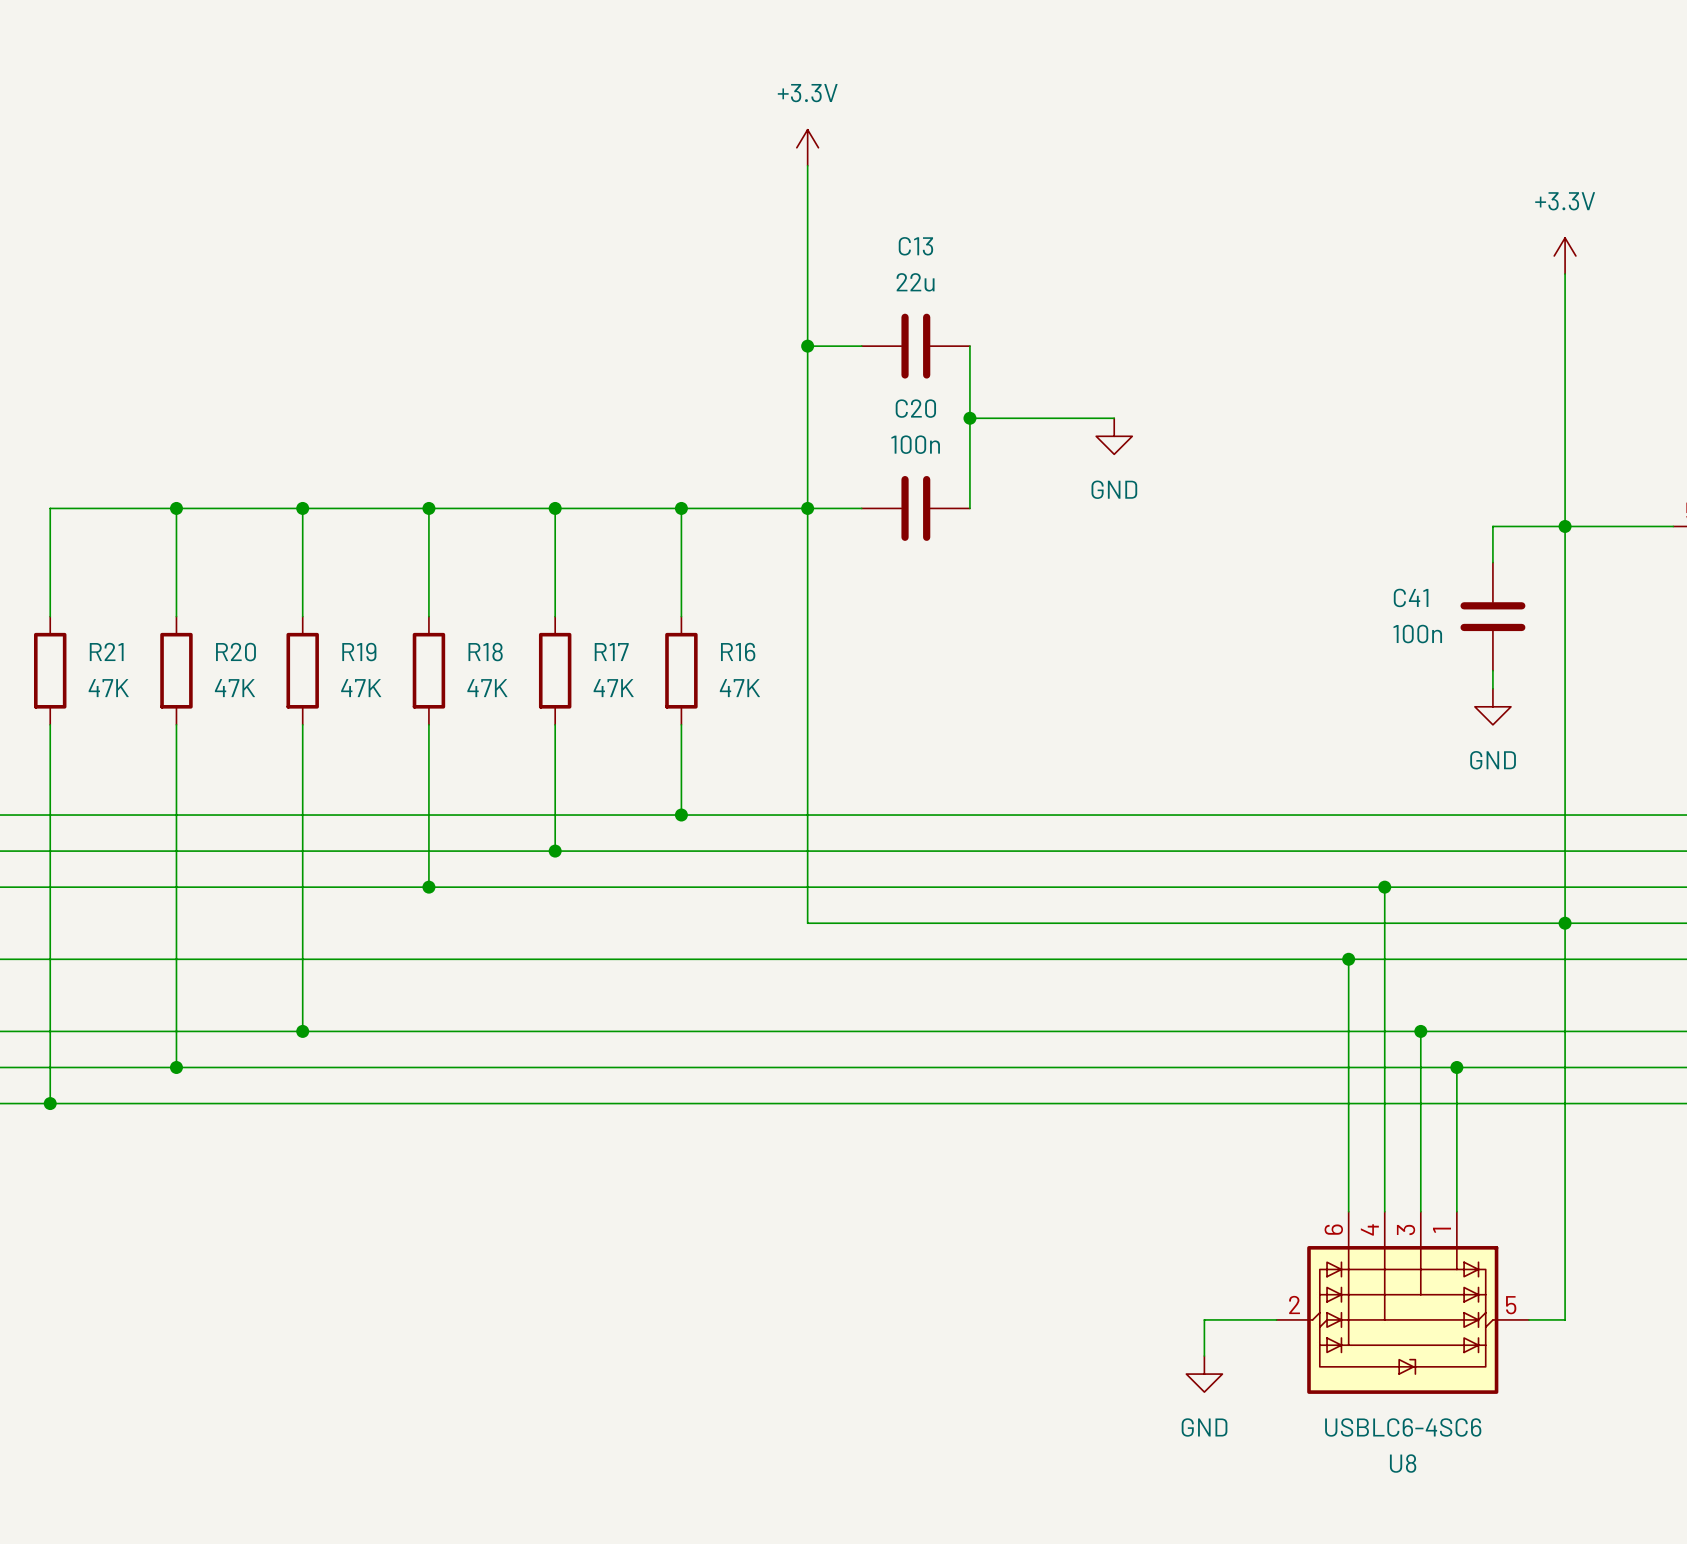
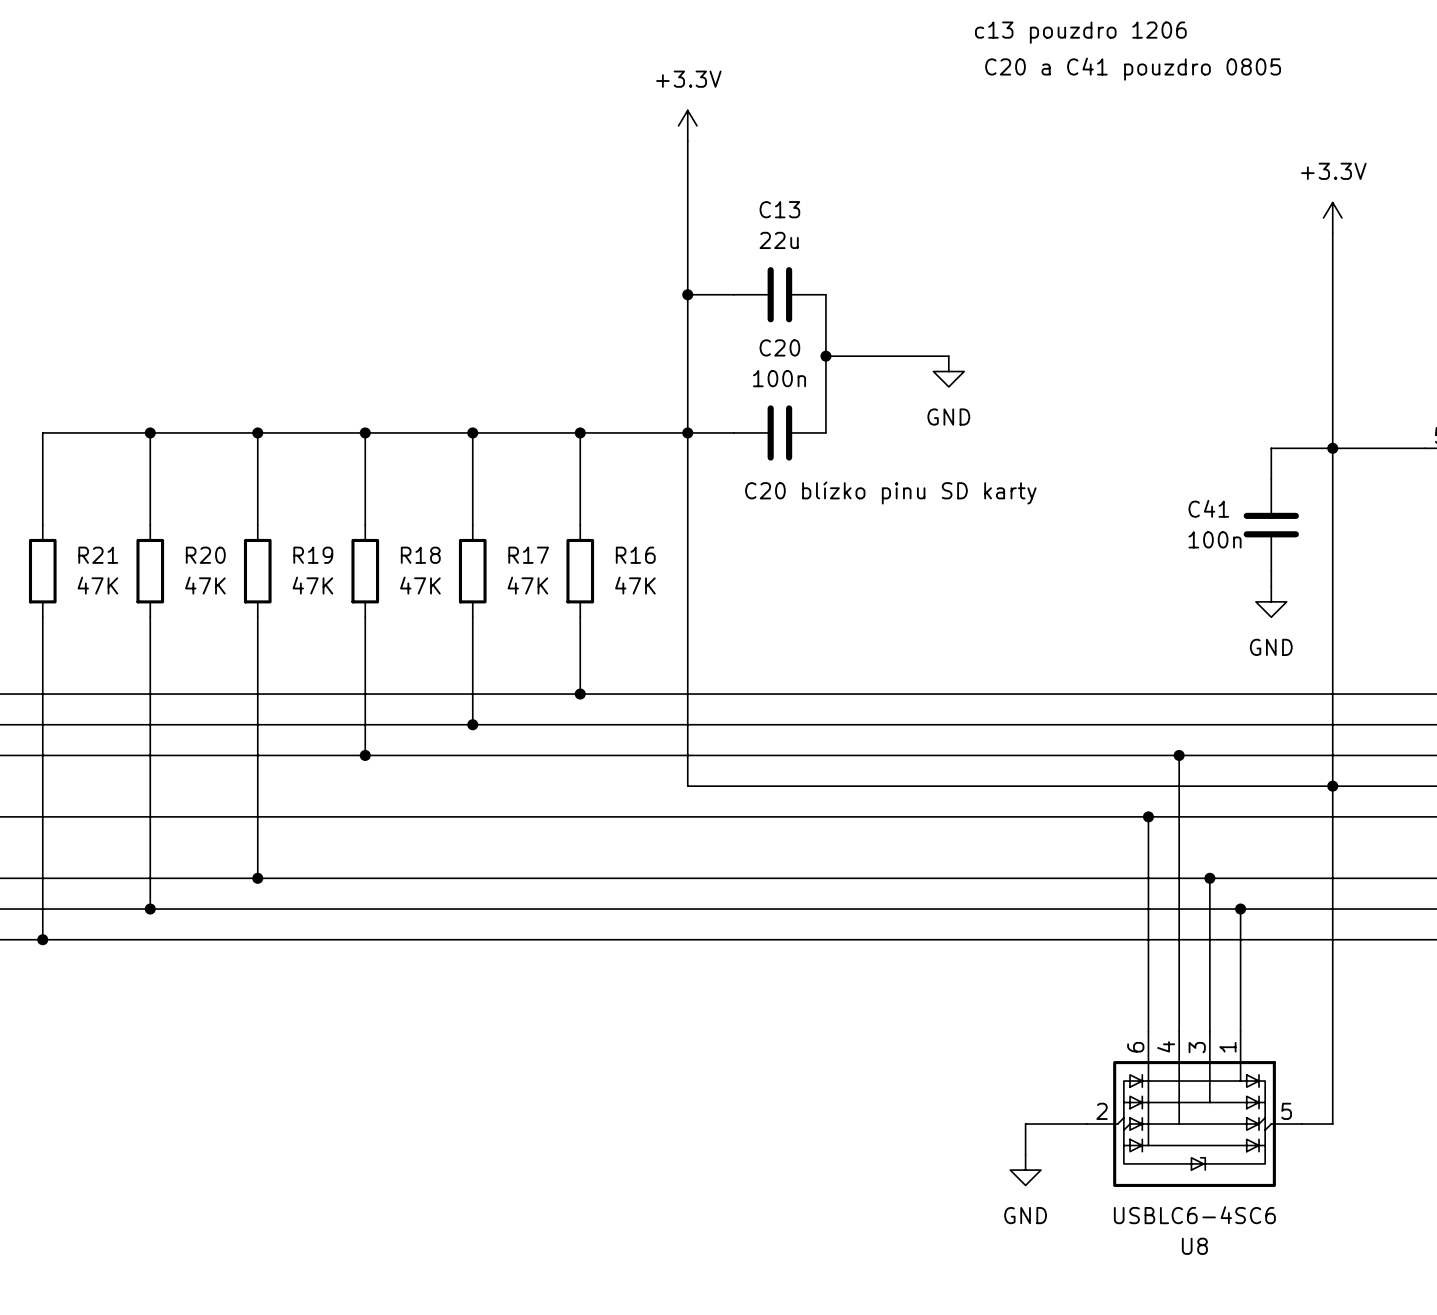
text: none -> c13 pouzdro 1206 (1080, 32)
text: none -> C20 a C41 pouzdro 0805 (1133, 69)
text: none -> C20 blízko pinu SD karty (890, 492)

